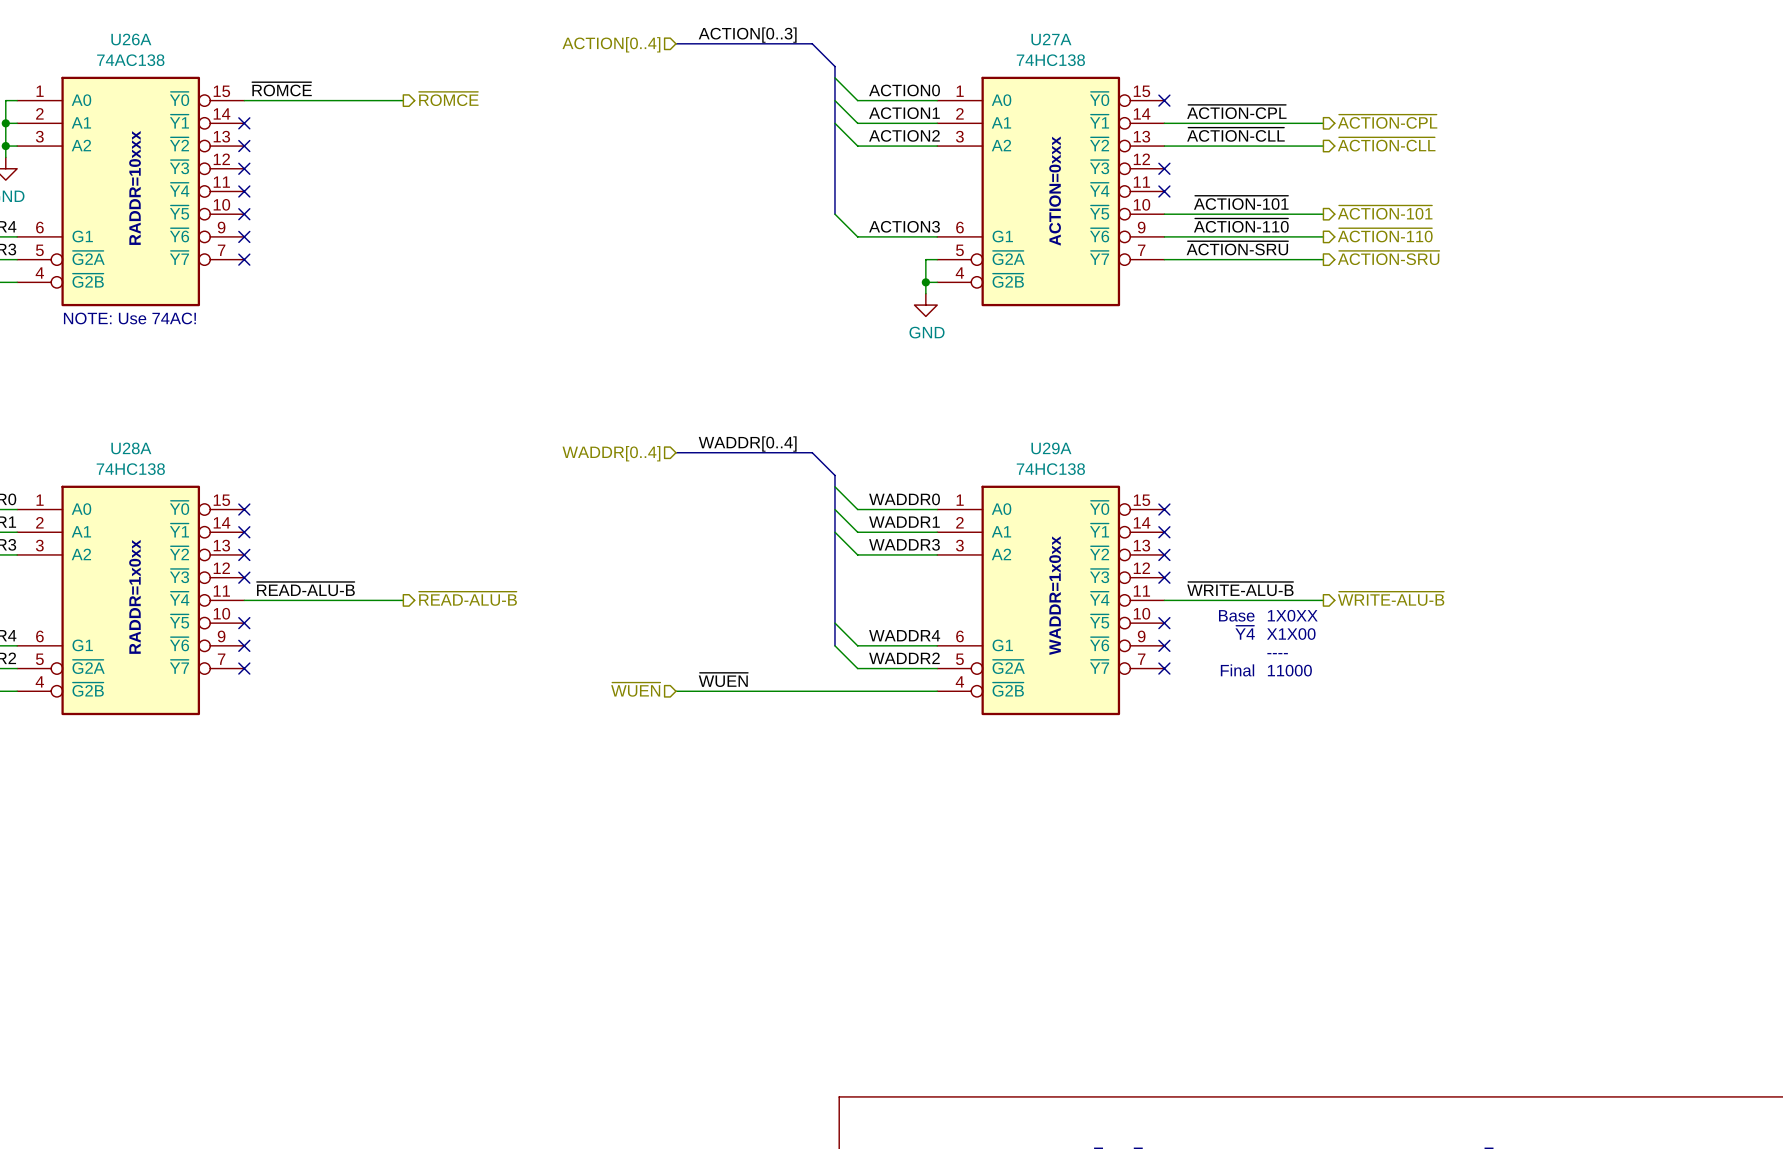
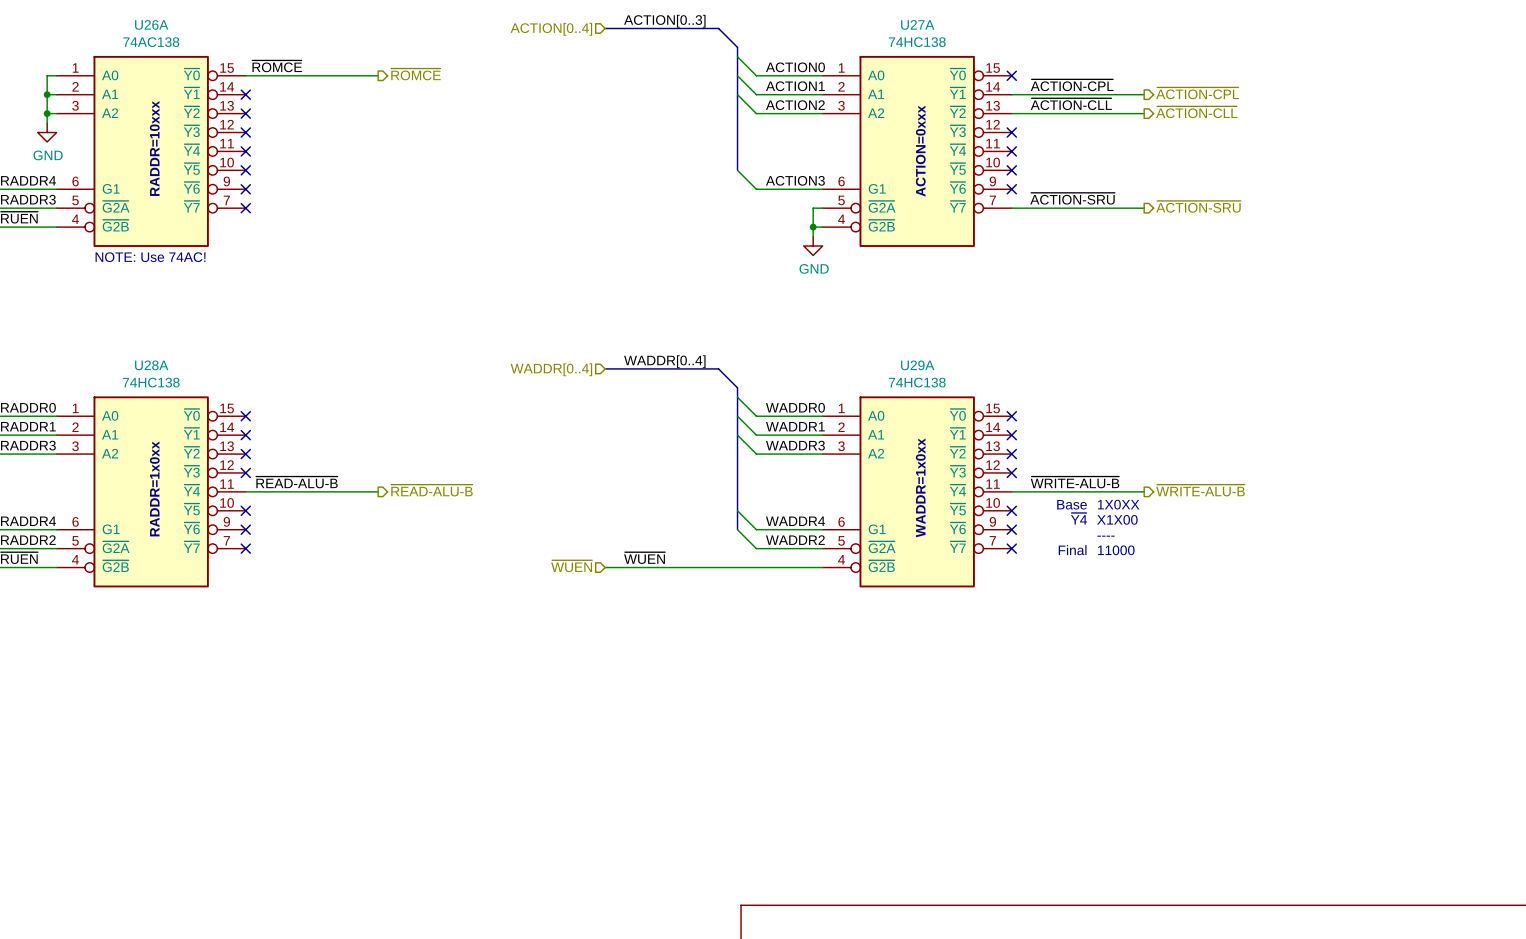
label: ~{ACTION-101} (1241, 202) -> none
hierarchical label: ~{ACTION-101} (1385, 212) -> none
wire: (1164, 214) (1323, 214) -> none
no-connect mark: none -> (1011, 170)
label: ~{ACTION-110} (1241, 225) -> none
hierarchical label: ~{ACTION-110} (1385, 235) -> none
wire: (1164, 236) (1323, 236) -> none
no-connect mark: none -> (1011, 189)

